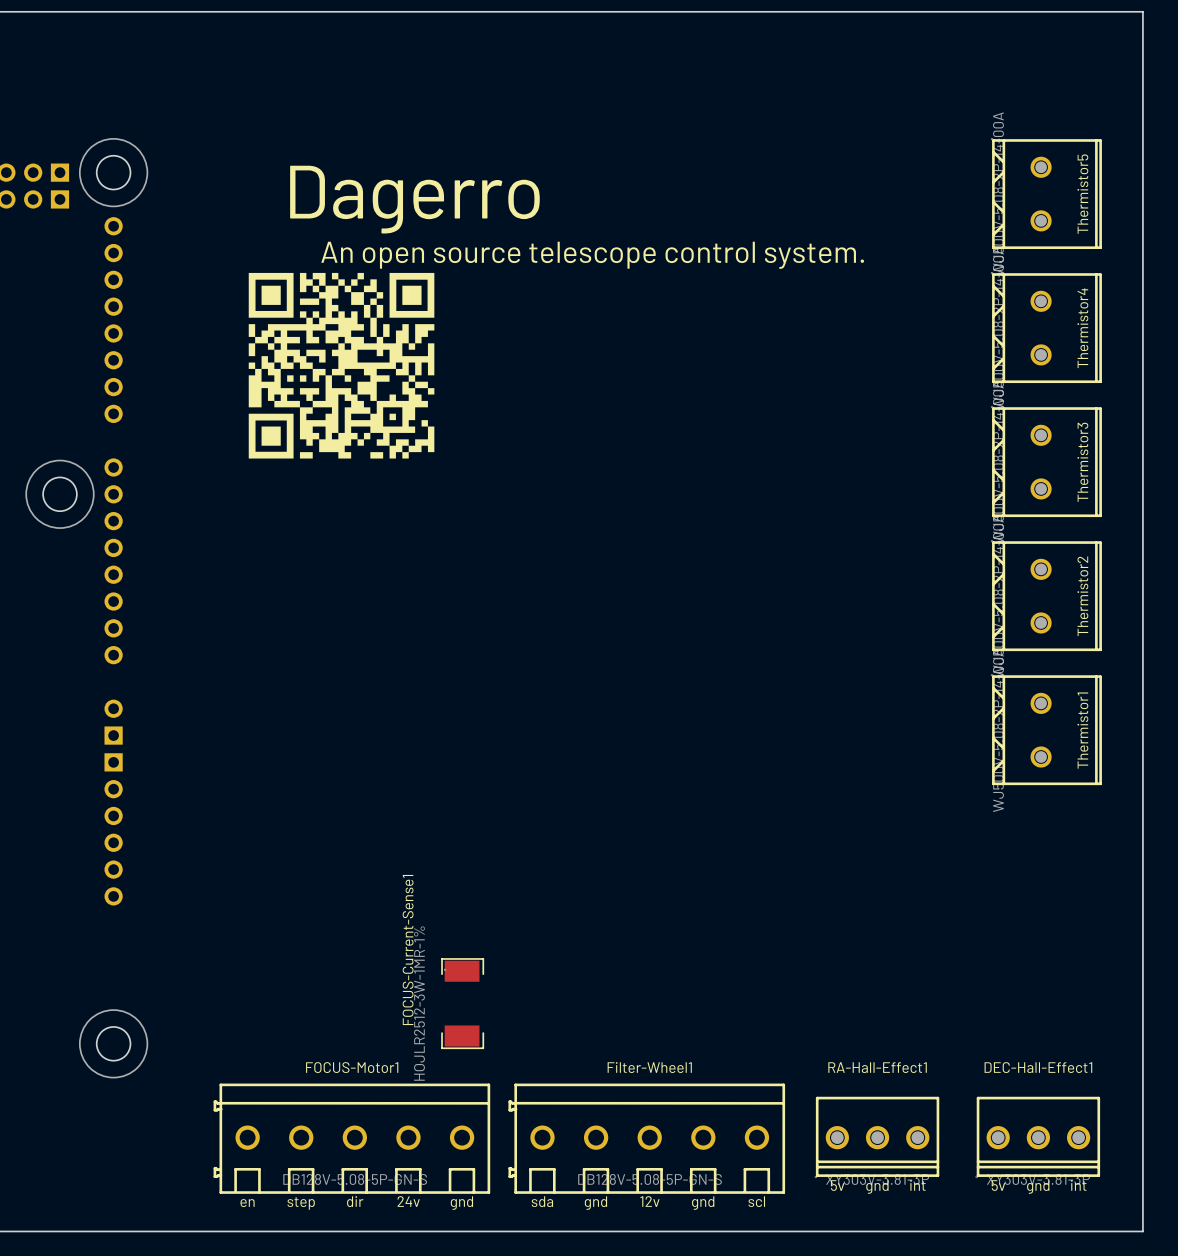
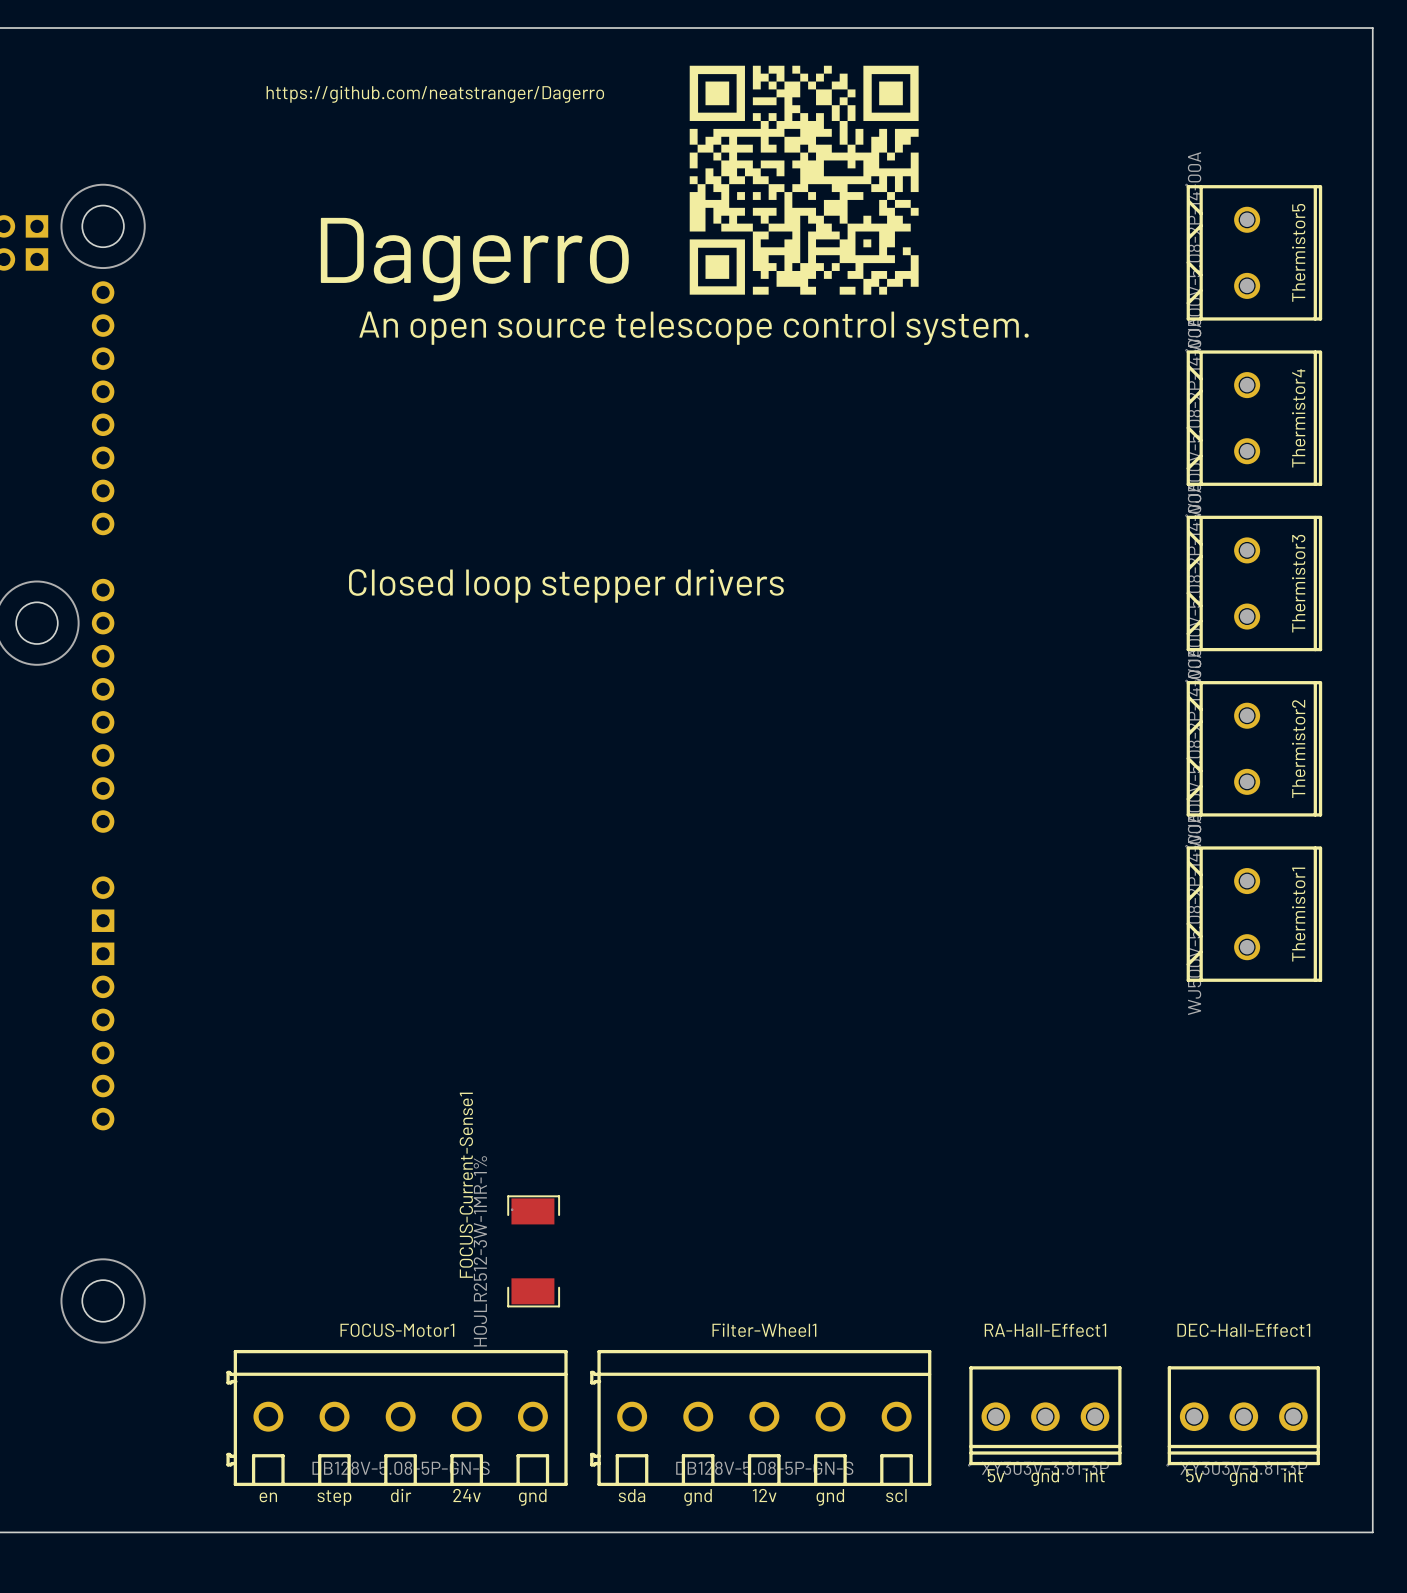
drawing: none -> [689, 65, 919, 295]
text: none -> https://github.com/neatstranger/Dagerro (435, 94)
drawing: [248, 272, 435, 459] -> none
text: none -> Closed loop stepper drivers (566, 585)

